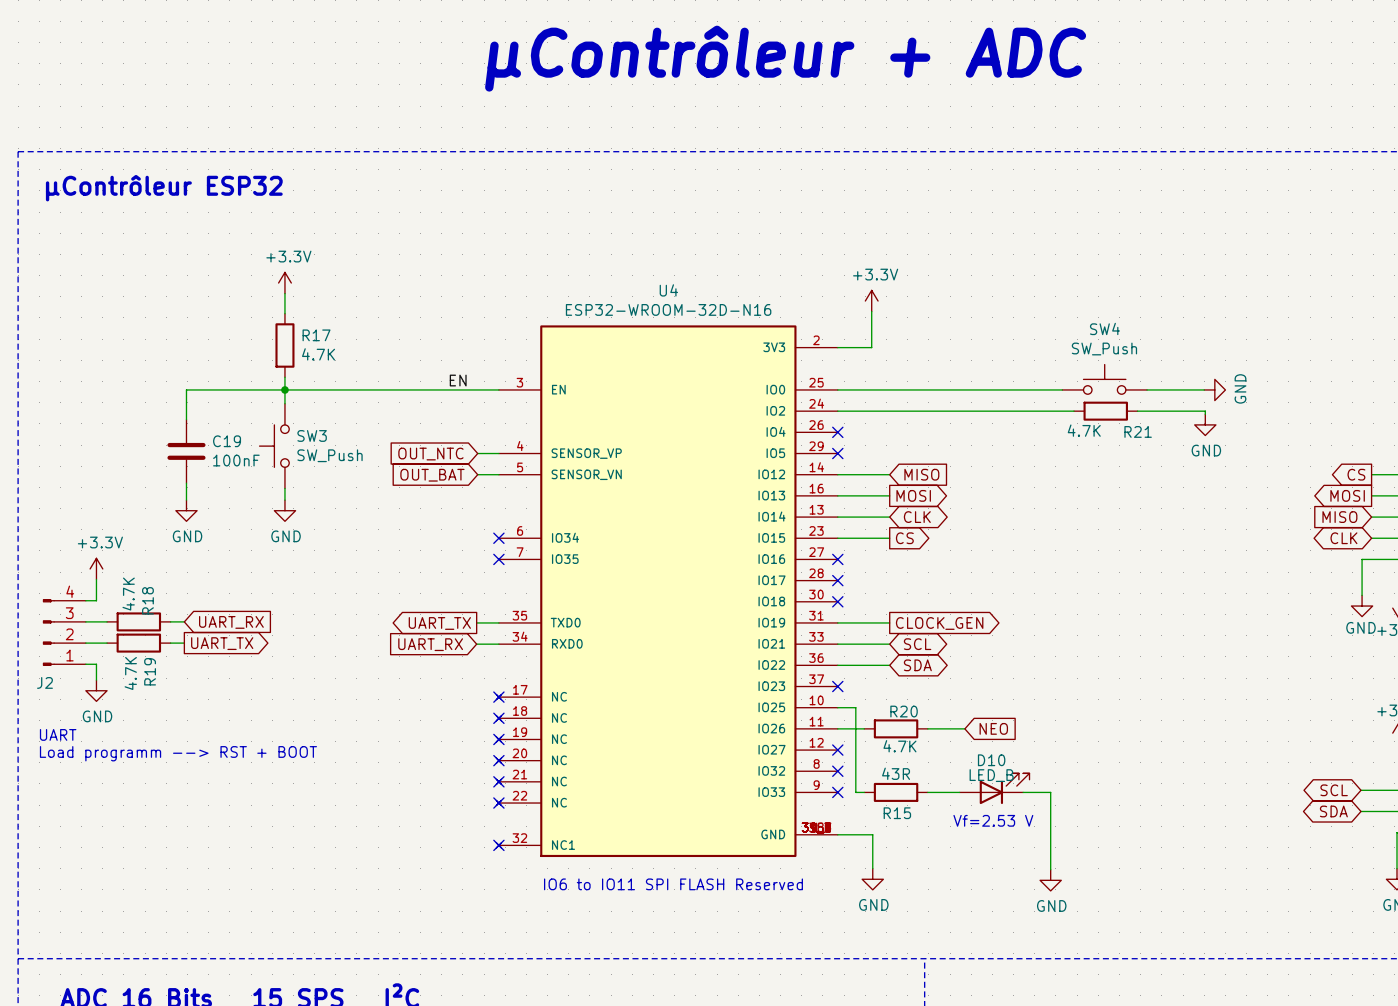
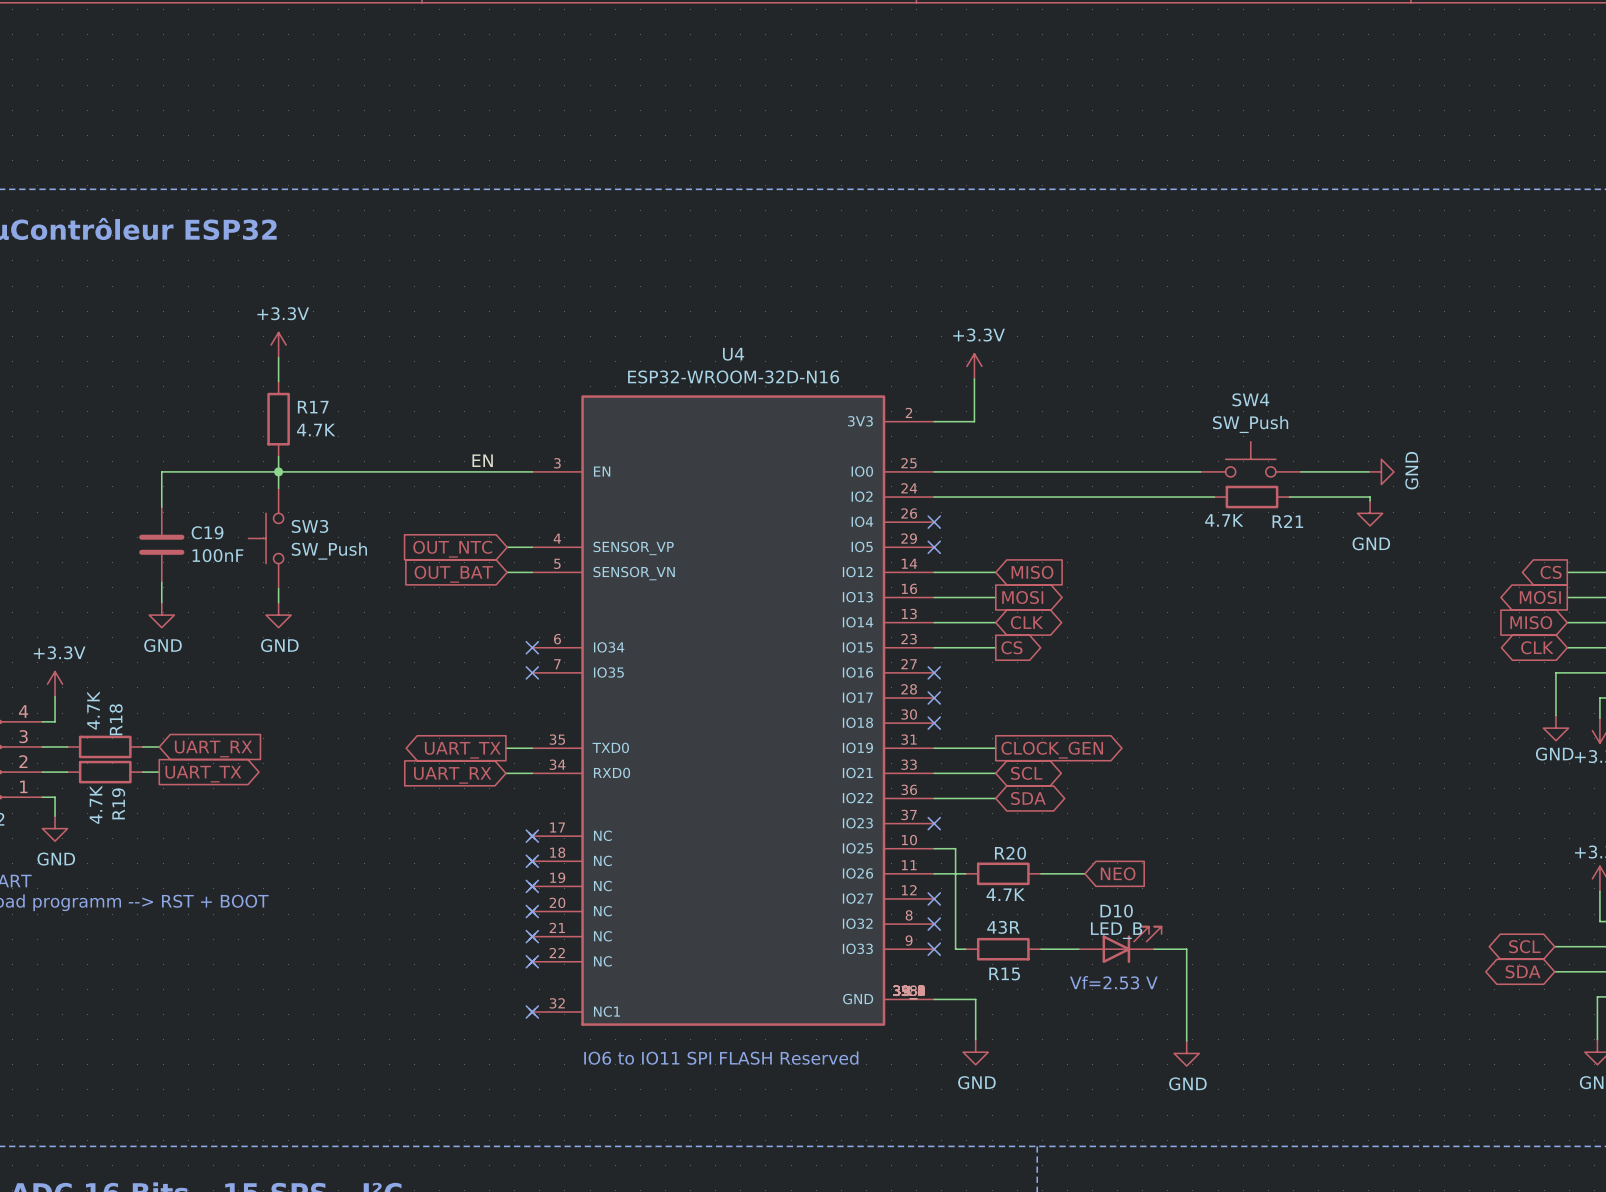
text: μContrôleur + ADC (785, 58) -> none

